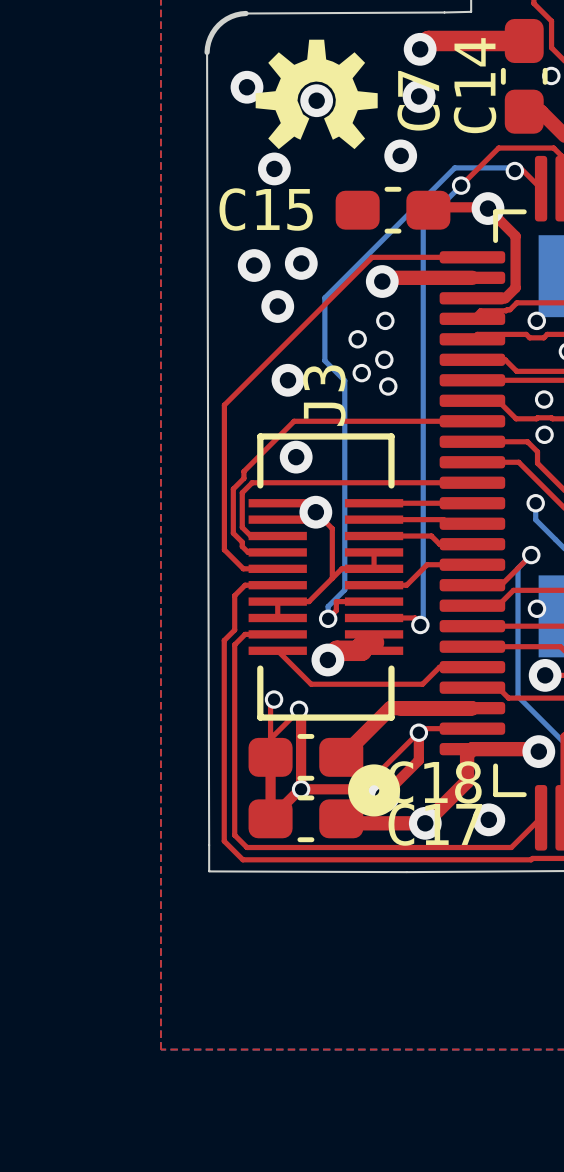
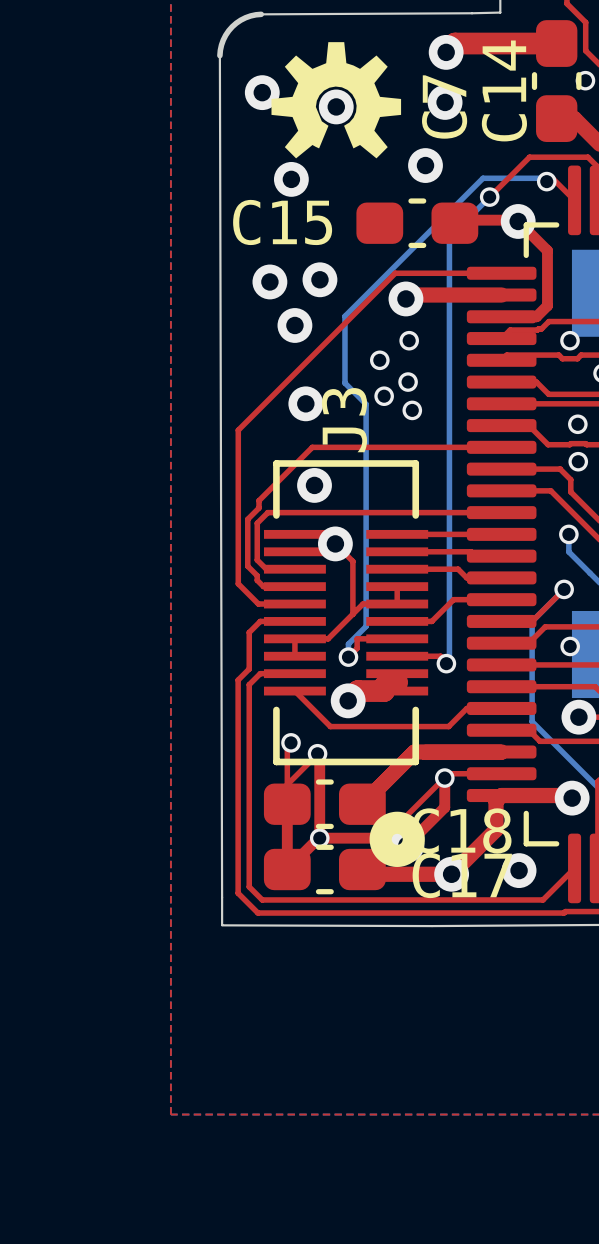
bottom track: (518, 568) (518, 696) -> (550, 603) (532, 621) (532, 721) (550, 739)

